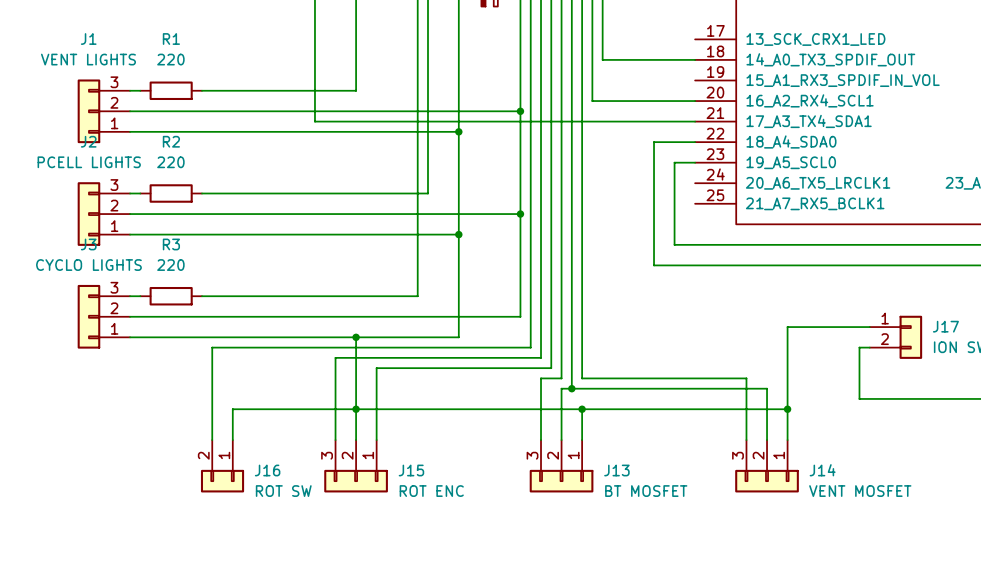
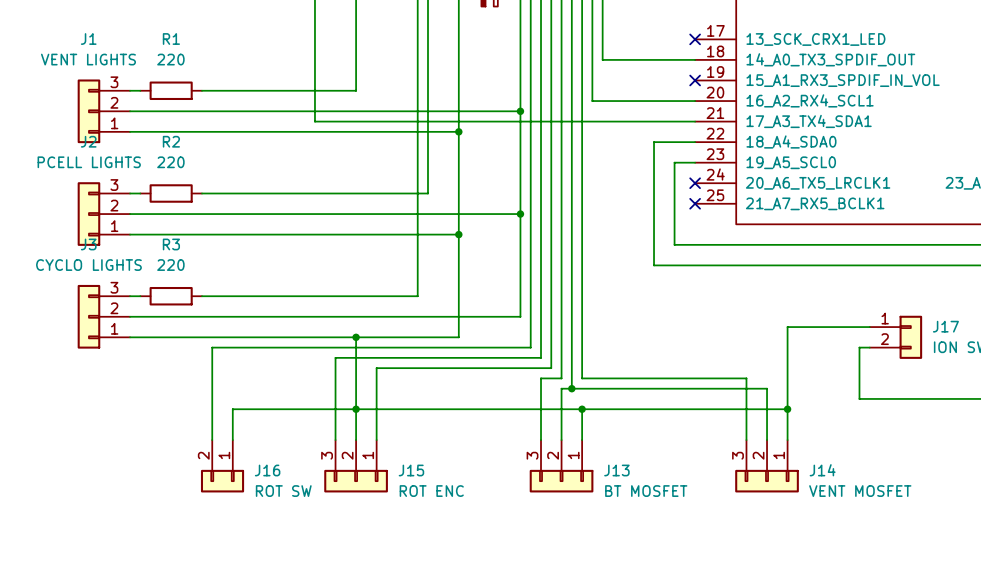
no-connect mark: none -> (695, 39)
no-connect mark: none -> (695, 80)
no-connect mark: none -> (695, 183)
no-connect mark: none -> (695, 203)

